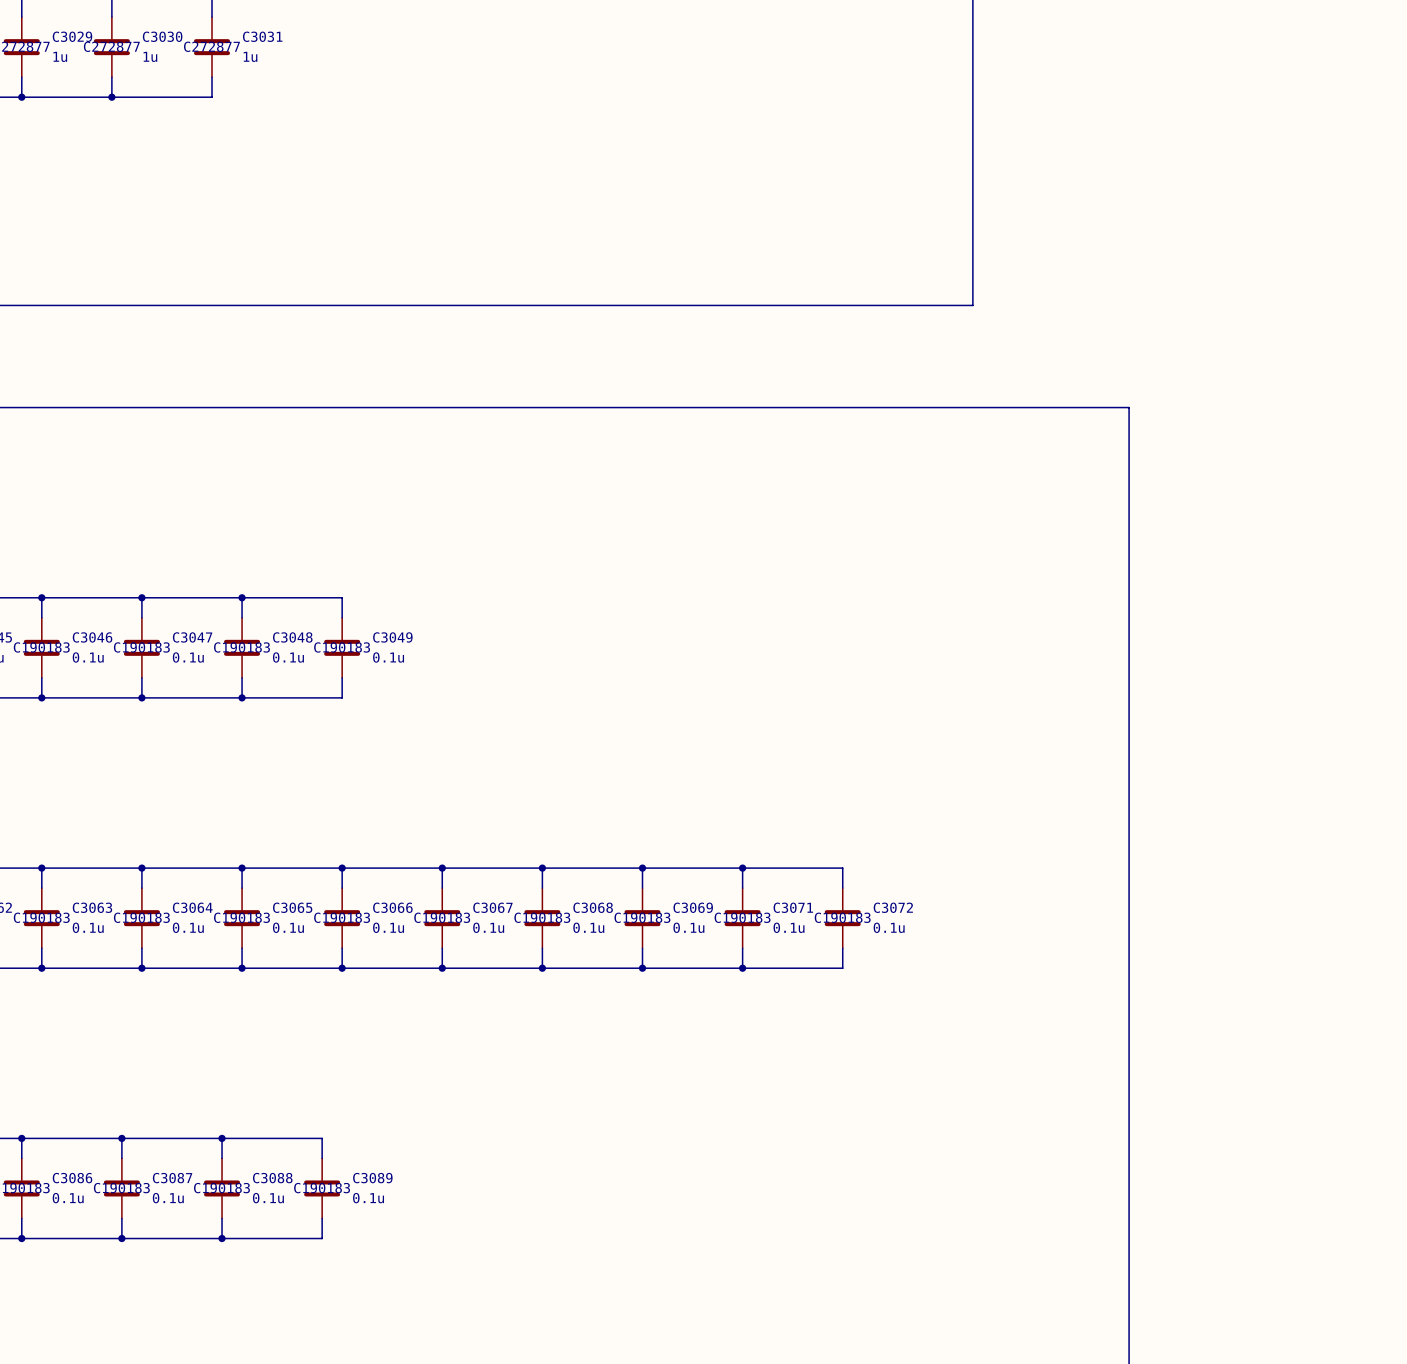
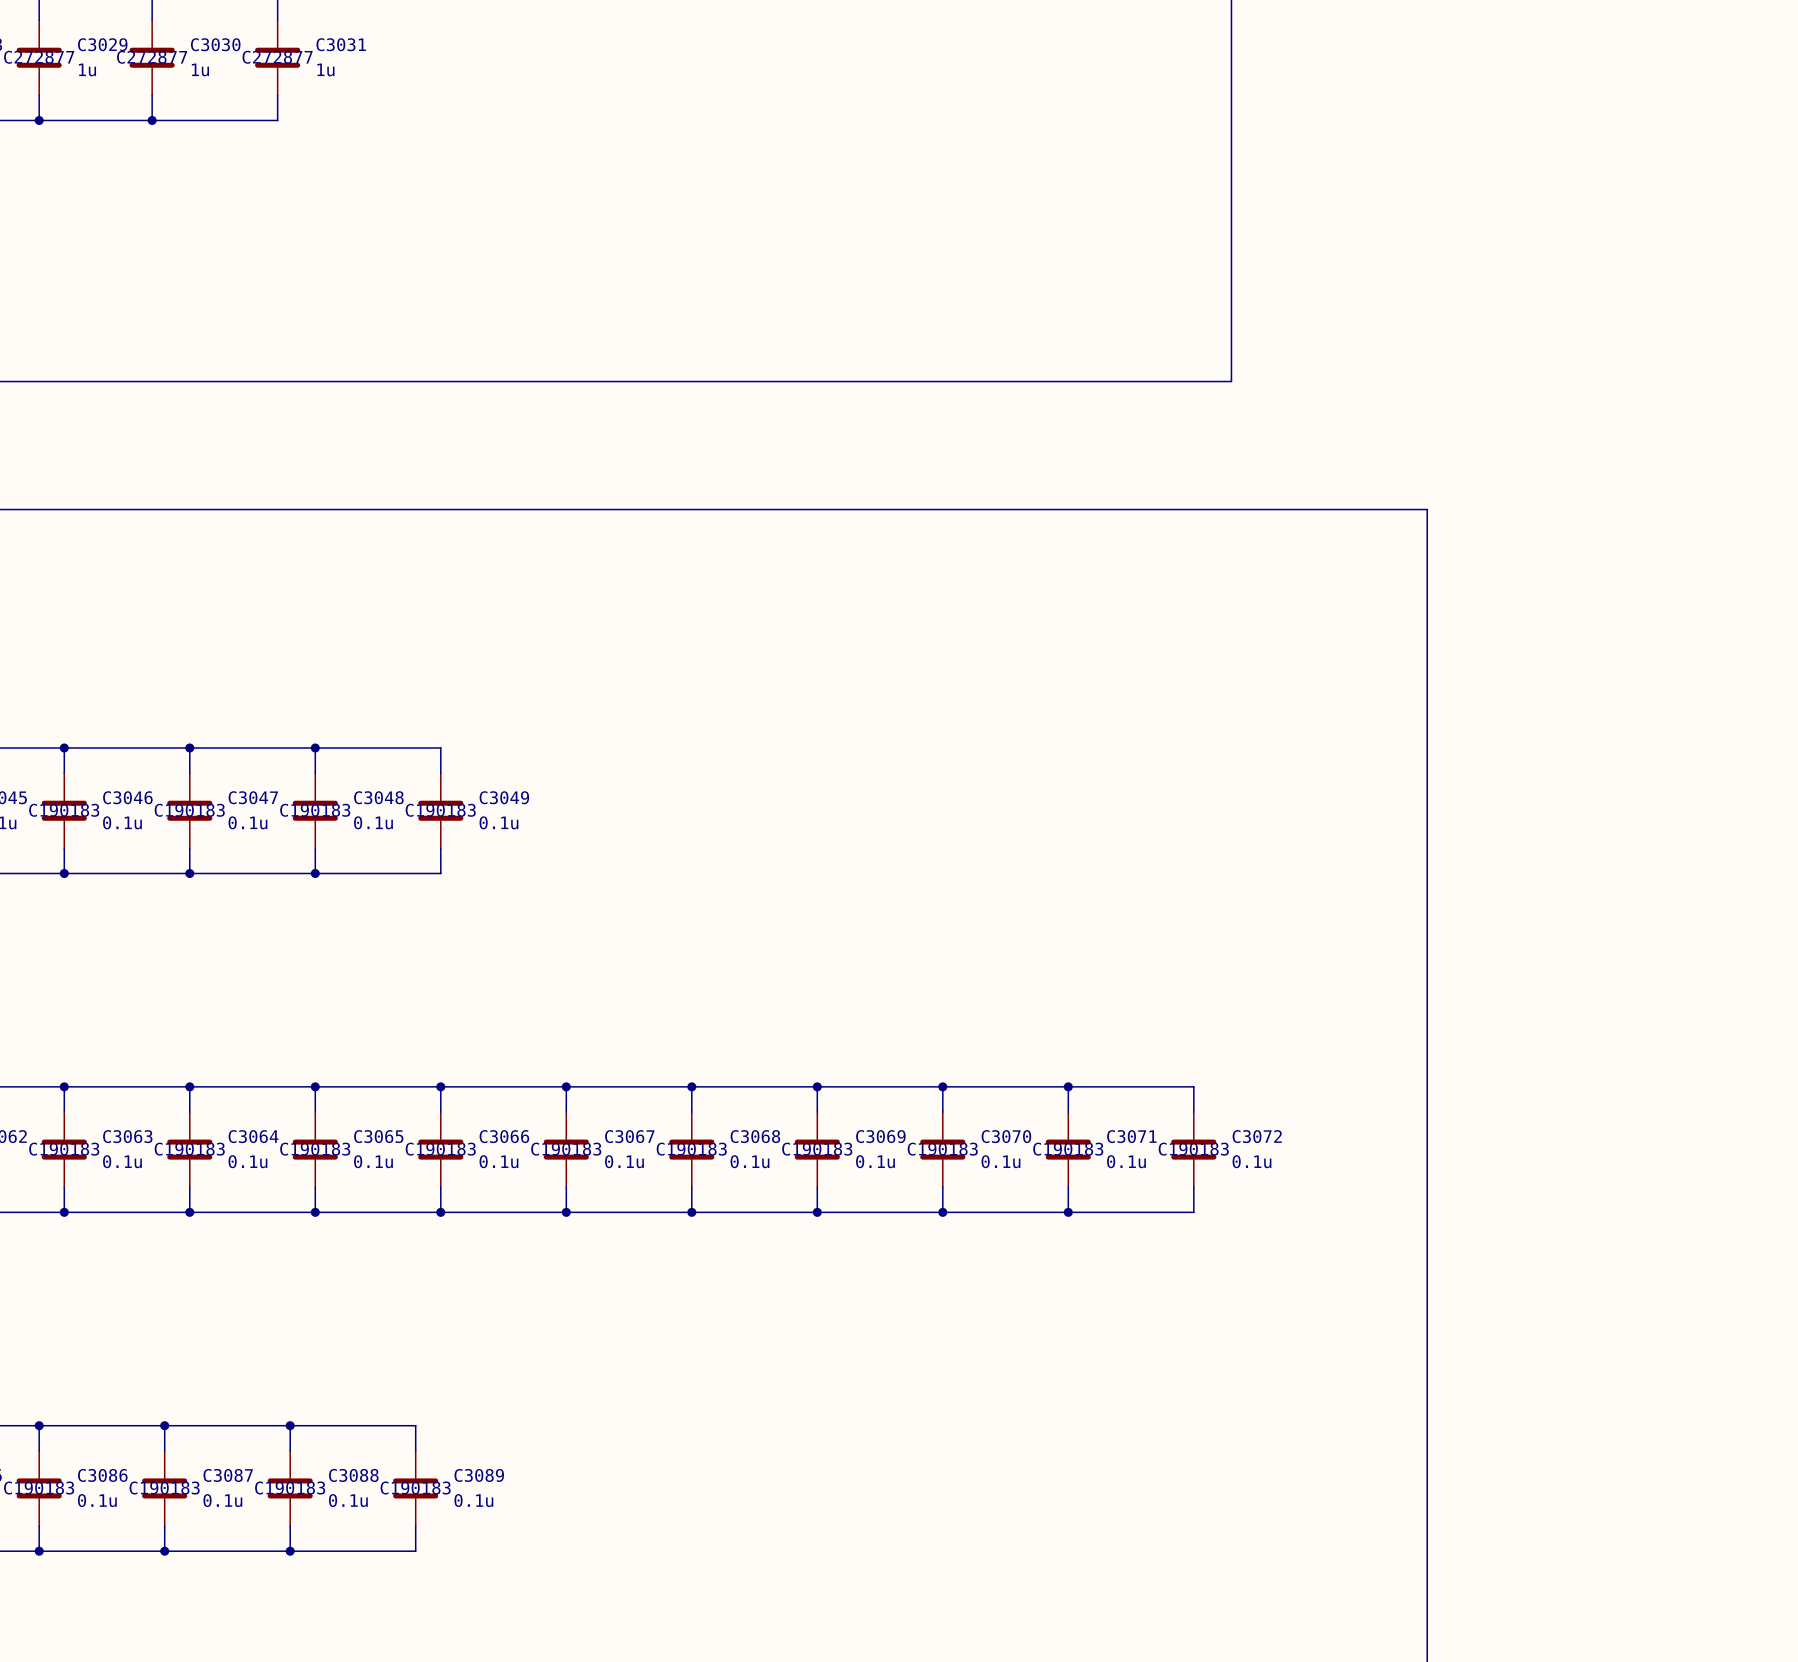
wire: none -> (1068, 1086) (1193, 1086) (1193, 1111)
junction: none -> (1068, 1086)
C3071 name: C3071 (793, 907) -> C3070 (1006, 1136)
C3072 name: C3072 (893, 907) -> C3071 (1131, 1136)
C3072: none -> 0.1u (1193, 1149)
wire: none -> (1193, 1187) (1193, 1212) (1068, 1212)
junction: none -> (1068, 1212)

